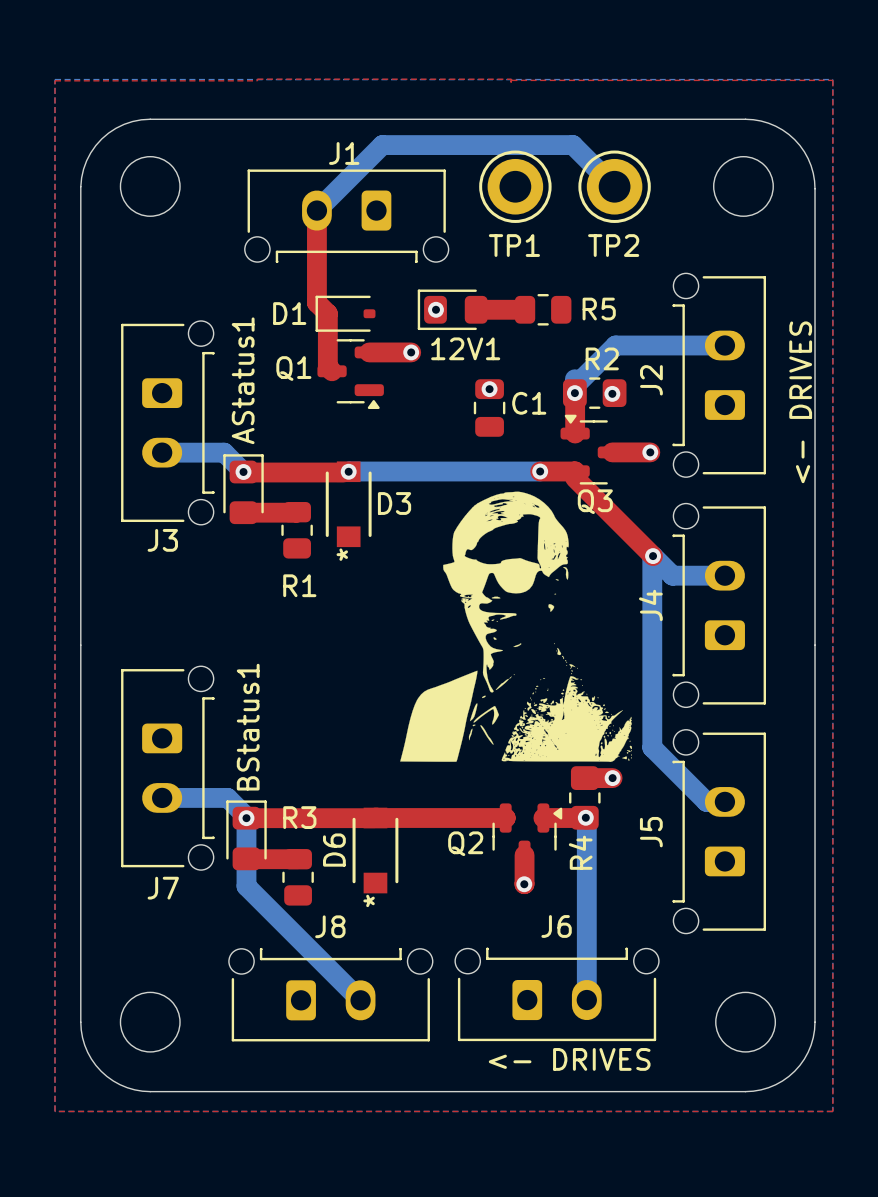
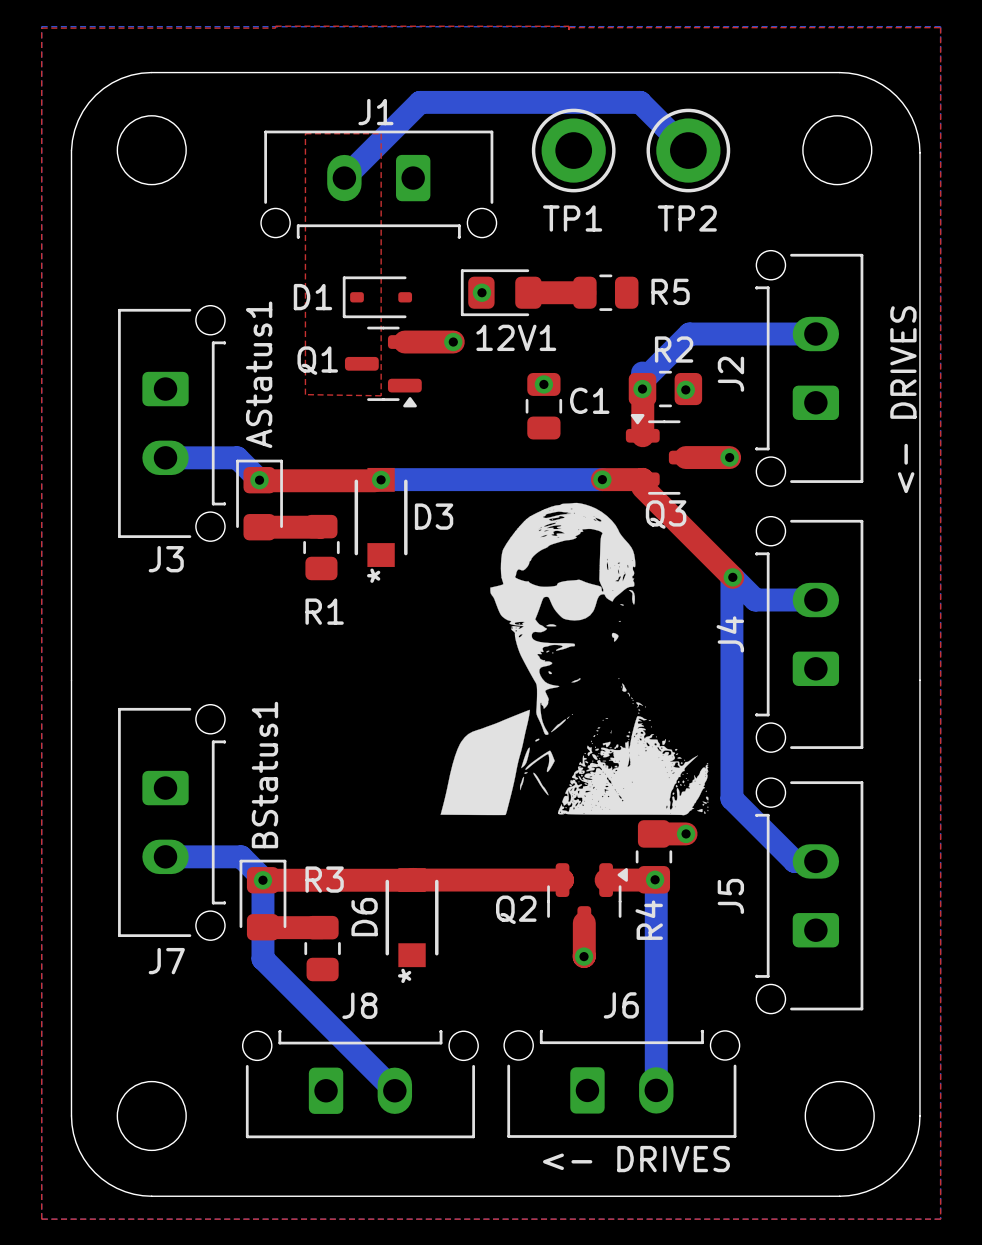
top zone outline: none -> (305, 133) (381, 133) (381, 395) (305, 394) (305, 133)
top track: (316, 210) (316, 302) (327, 313) (327, 367) (332, 371) -> none

